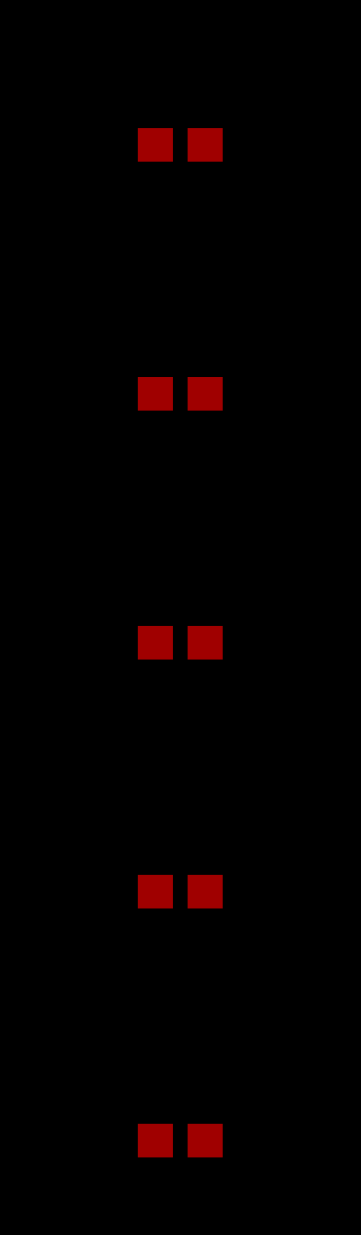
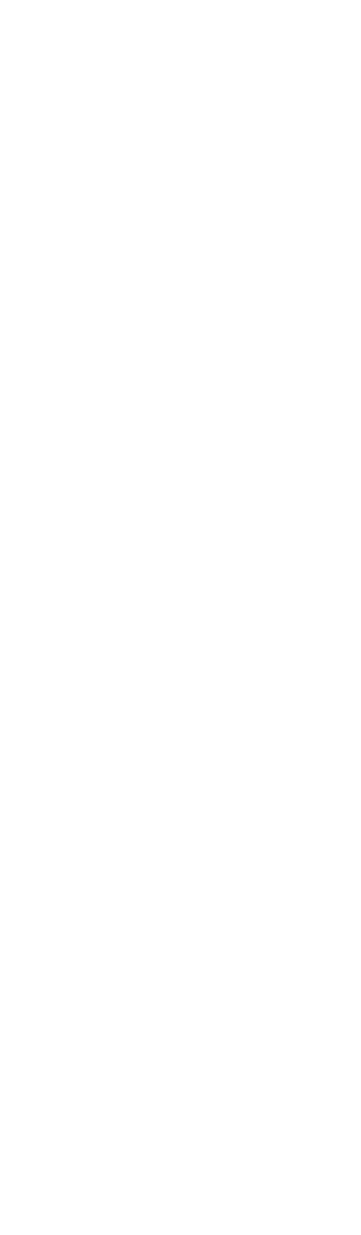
part: (180, 144) -> none
part: (180, 393) -> none
part: (180, 642) -> none
part: (180, 891) -> none
part: (180, 1140) -> none

